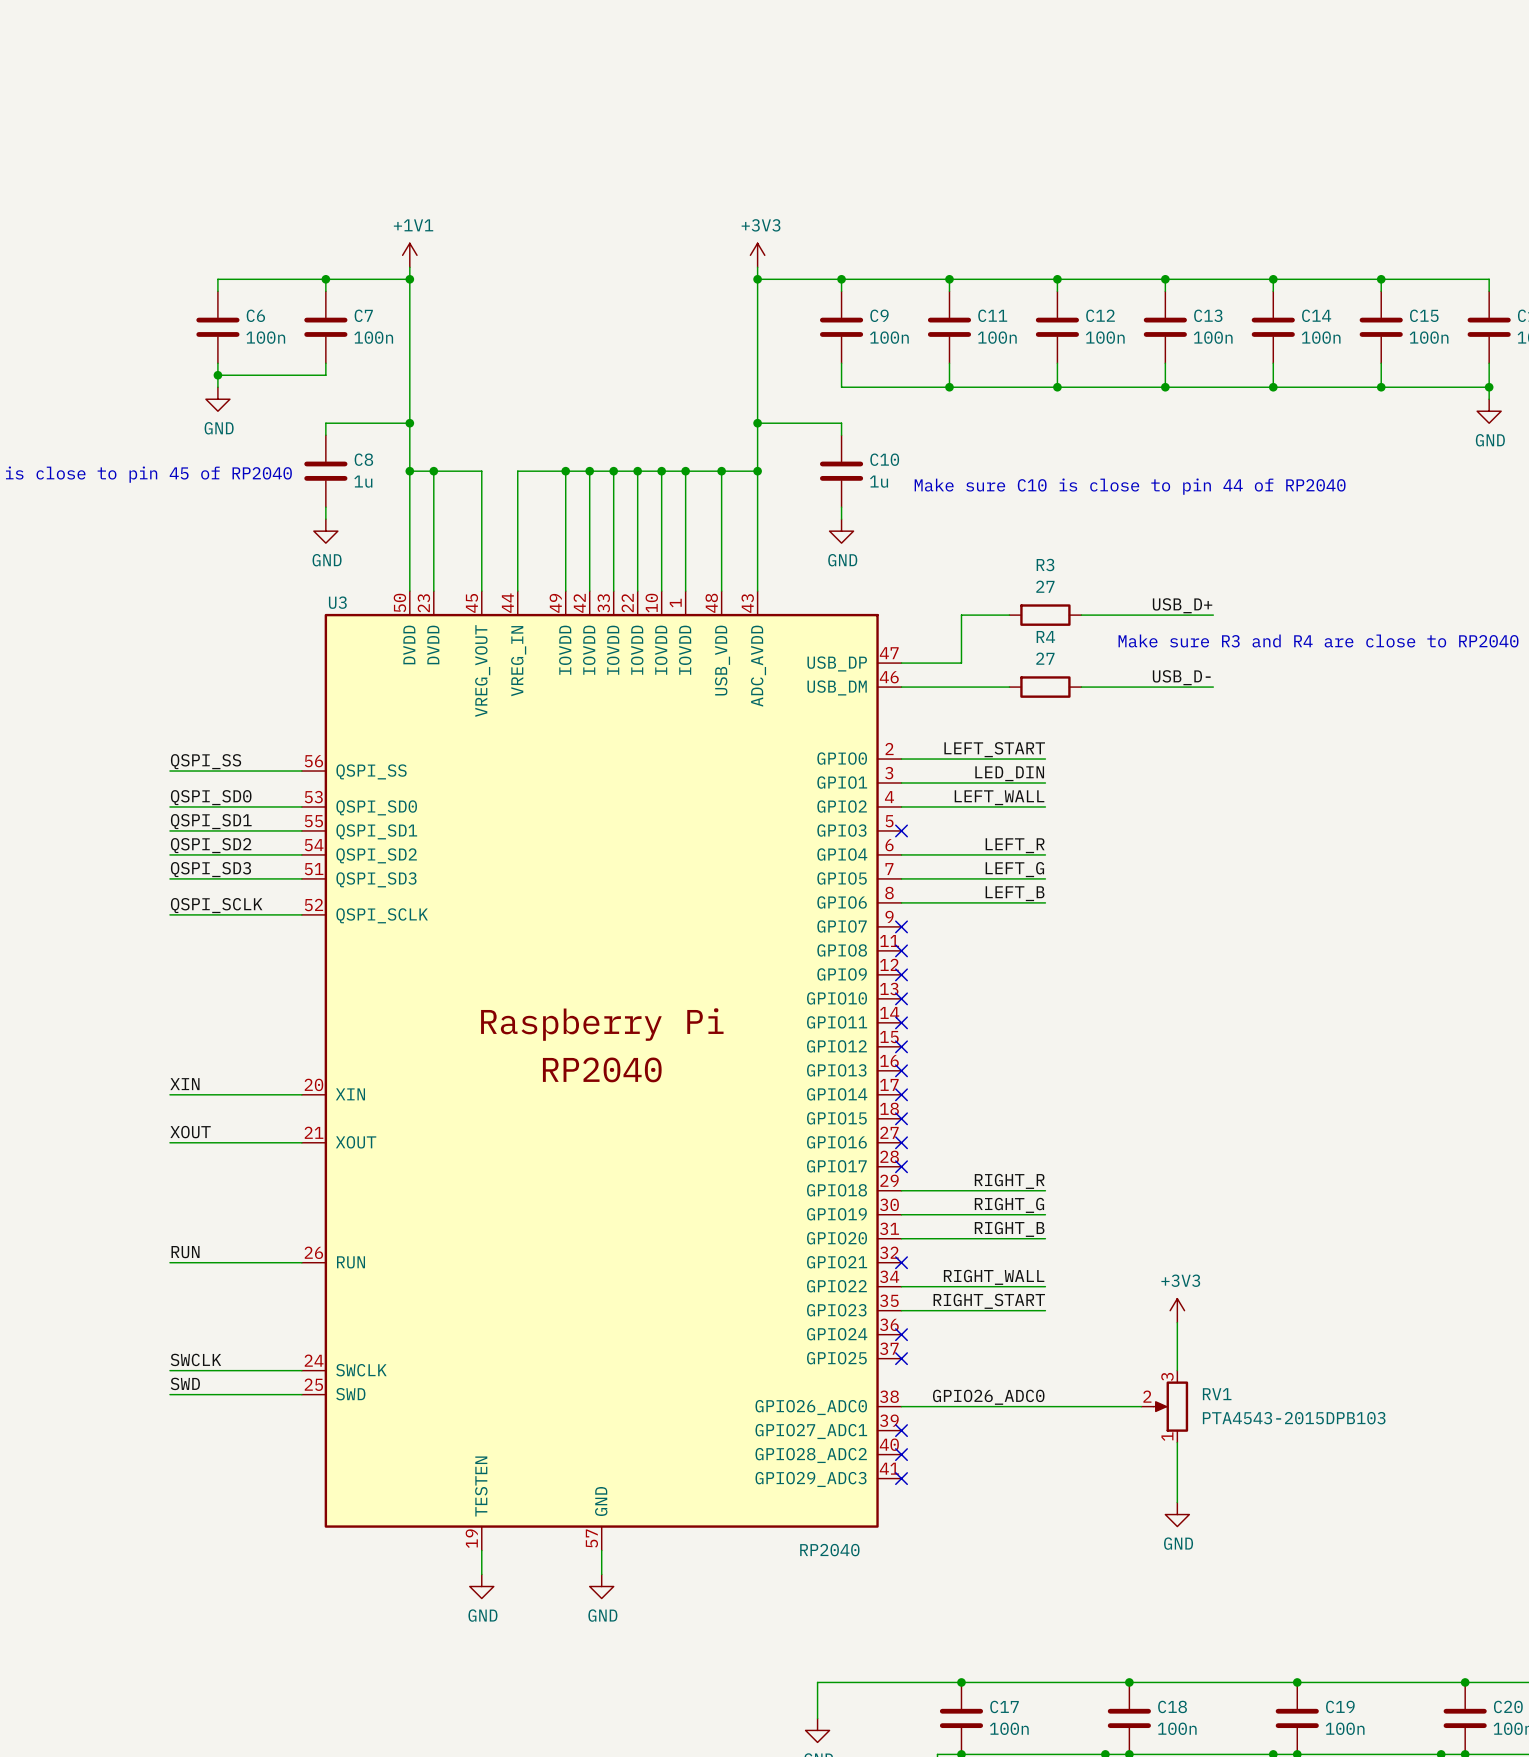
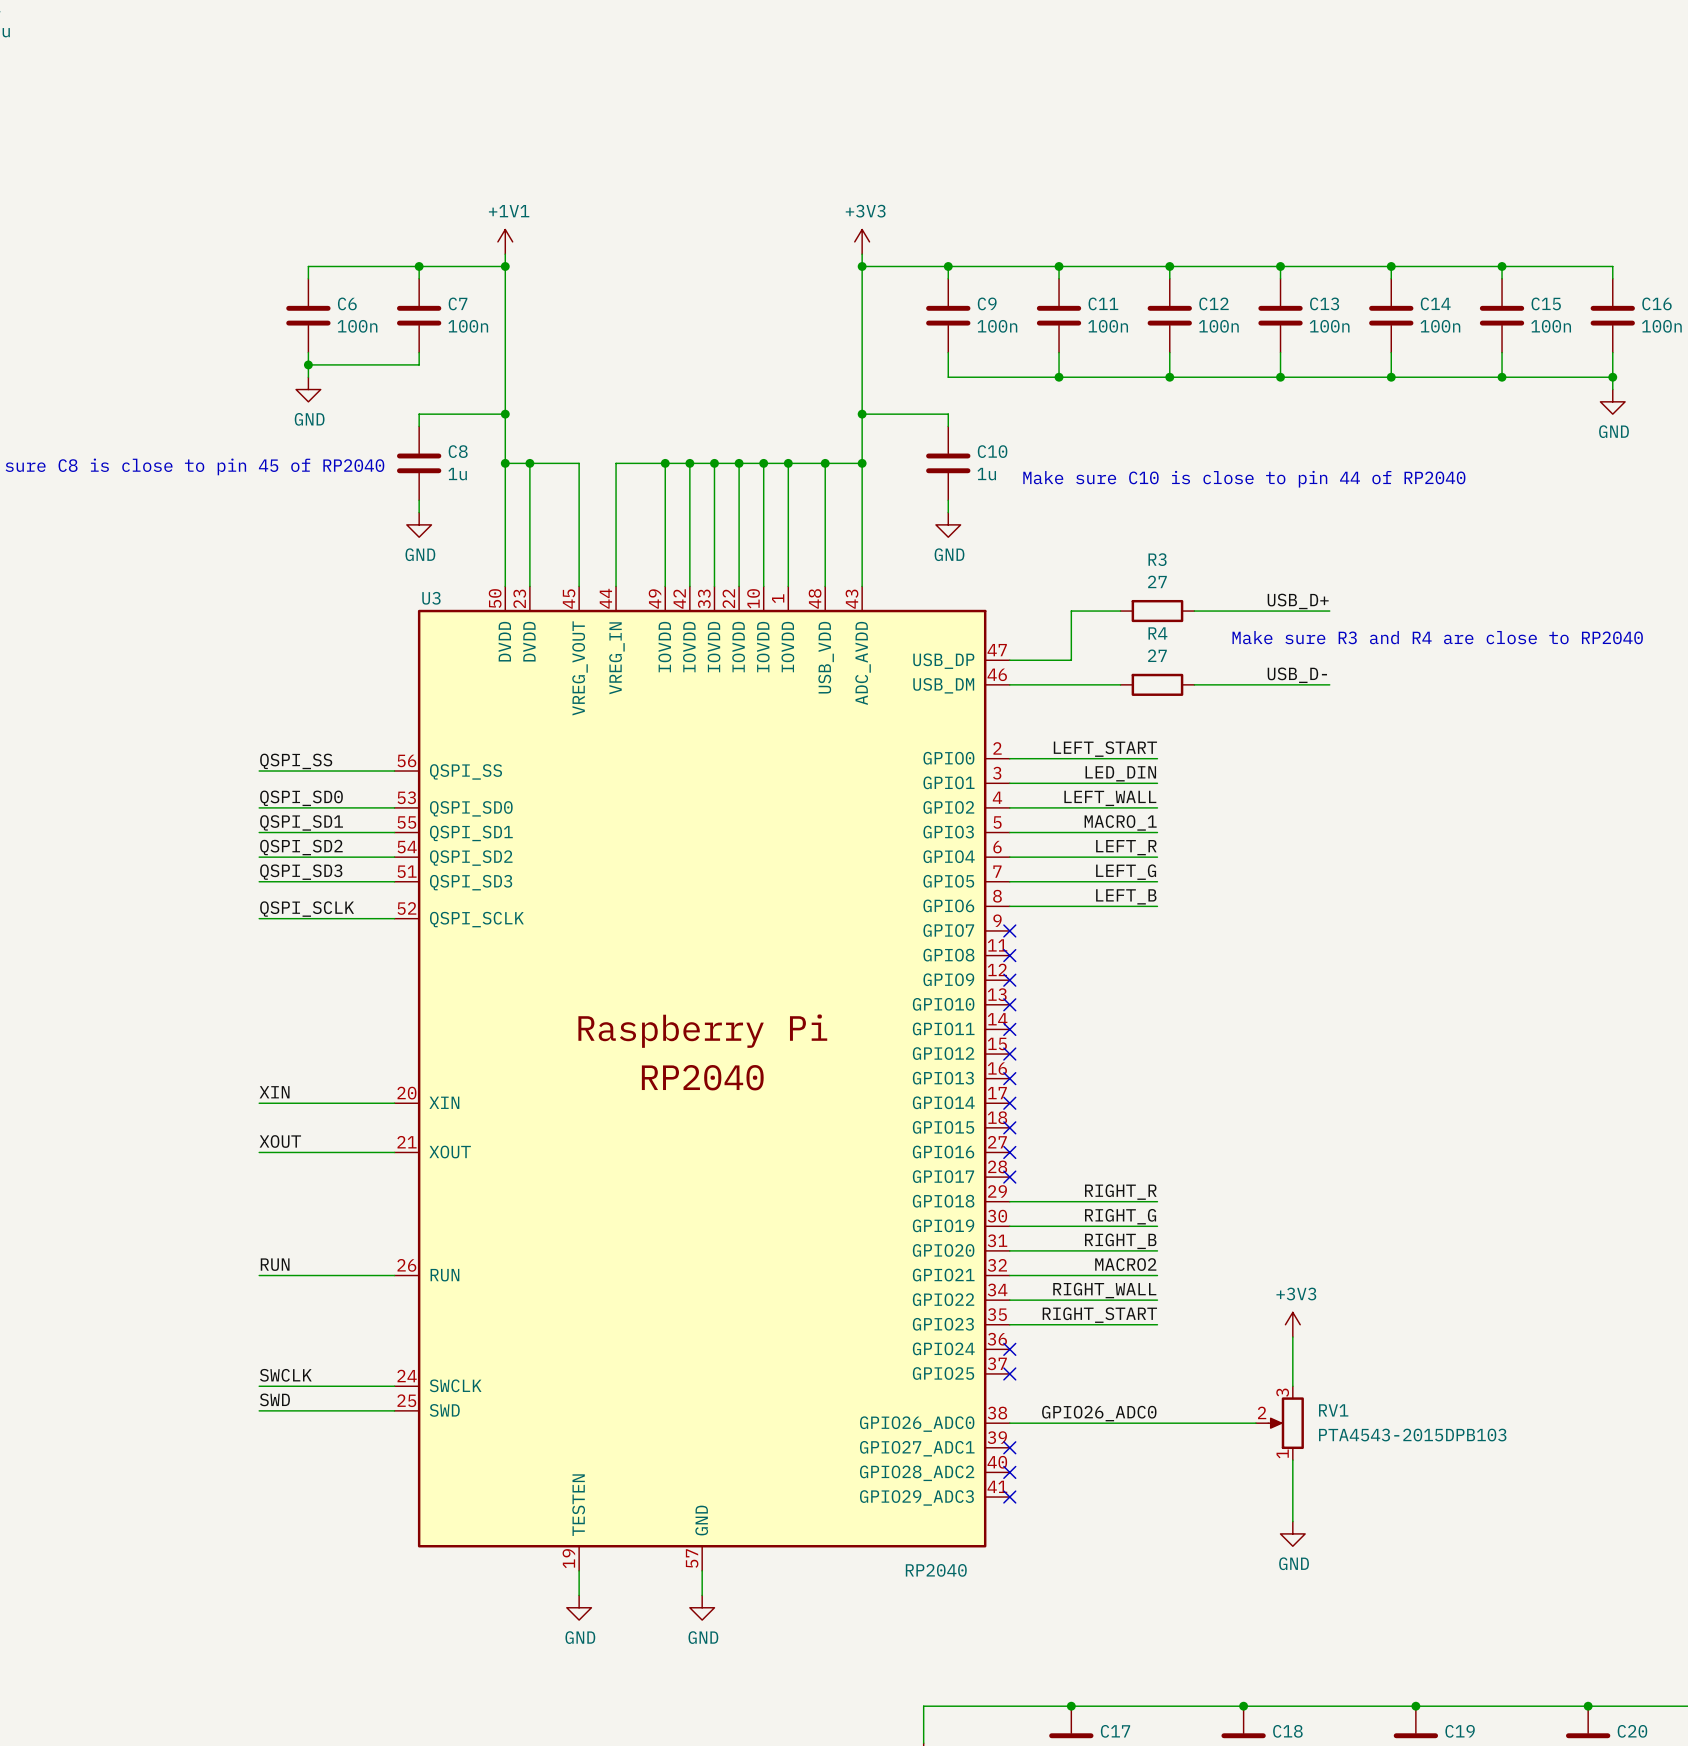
label: none -> MACRO_1 (1120, 822)
wire: none -> (1009, 832) (1157, 832)
no-connect mark: (901, 830) -> none
label: none -> MACRO2 (1125, 1264)
wire: none -> (1009, 1275) (1157, 1275)
no-connect mark: (901, 1262) -> none

